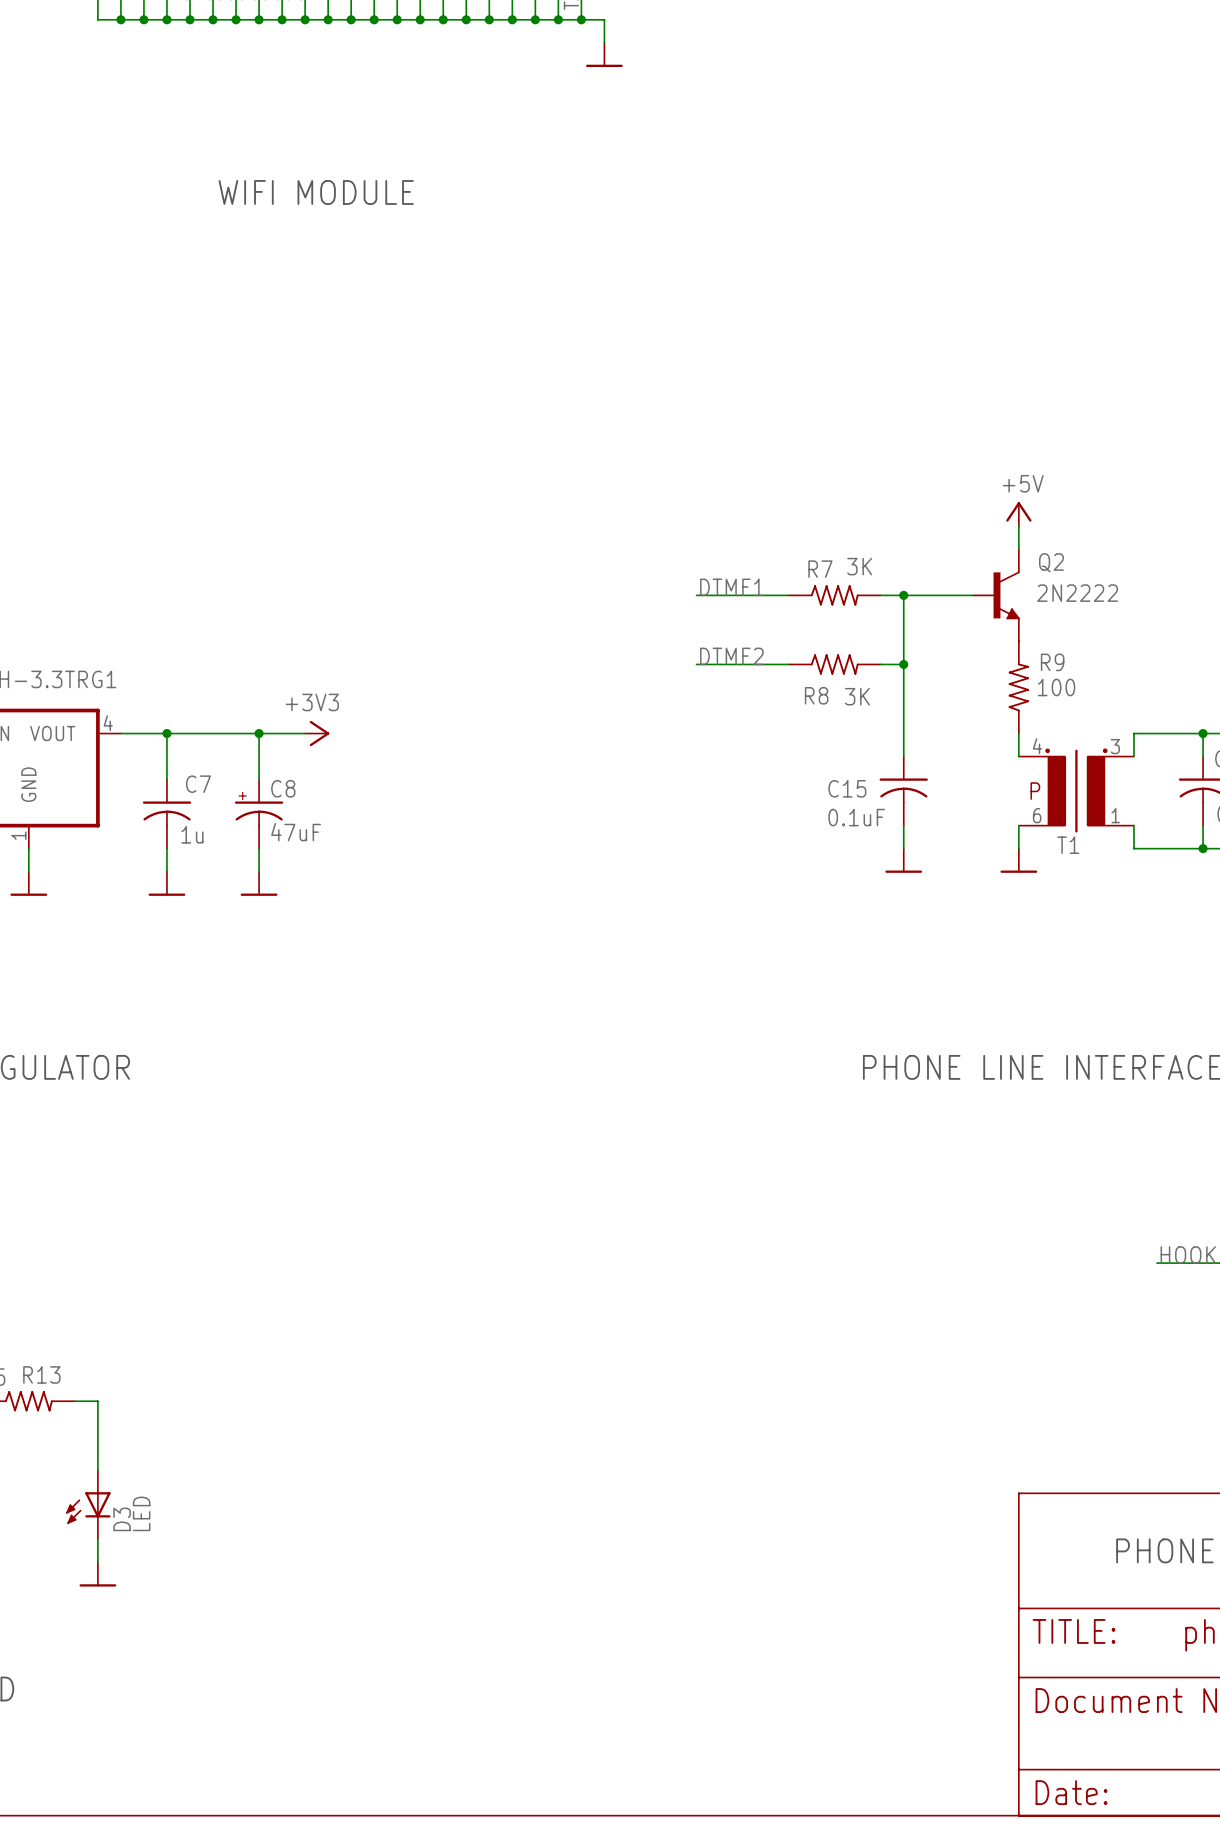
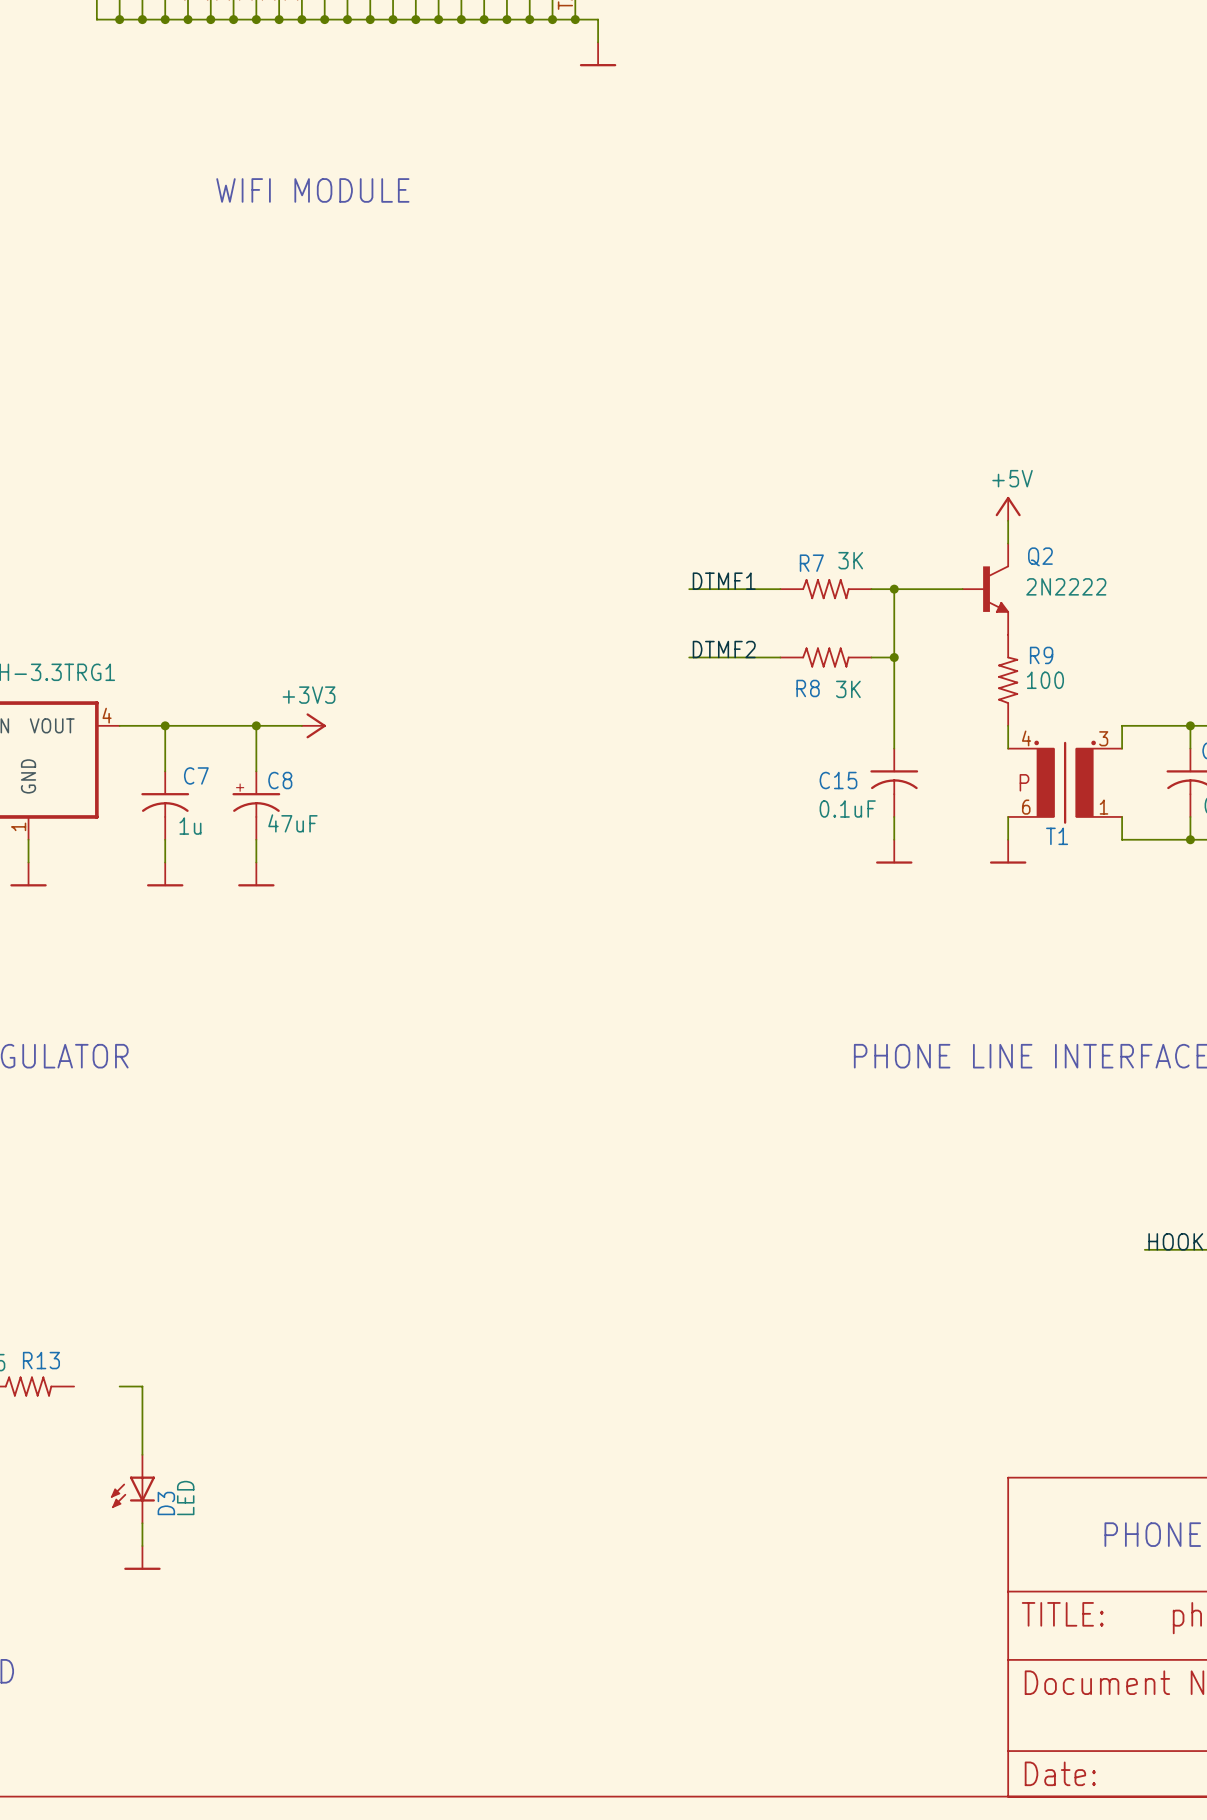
wire: (74, 1401) (97, 1401) (97, 1470) -> (119, 1386) (142, 1386) (142, 1454)
D3 position: (88, 1504) -> (132, 1489)
wire: (97, 1539) (97, 1562) -> (142, 1523) (142, 1546)
power symbol position: (97, 1574) -> (142, 1557)

